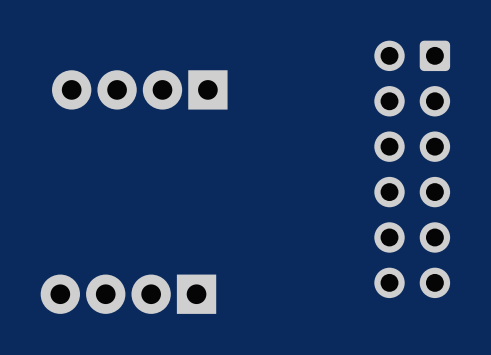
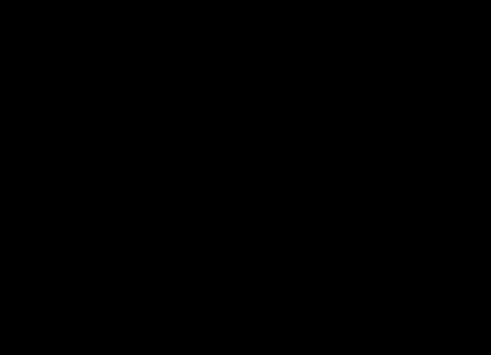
part: (139, 89) -> none
part: (412, 169) -> none
part: (128, 294) -> none

